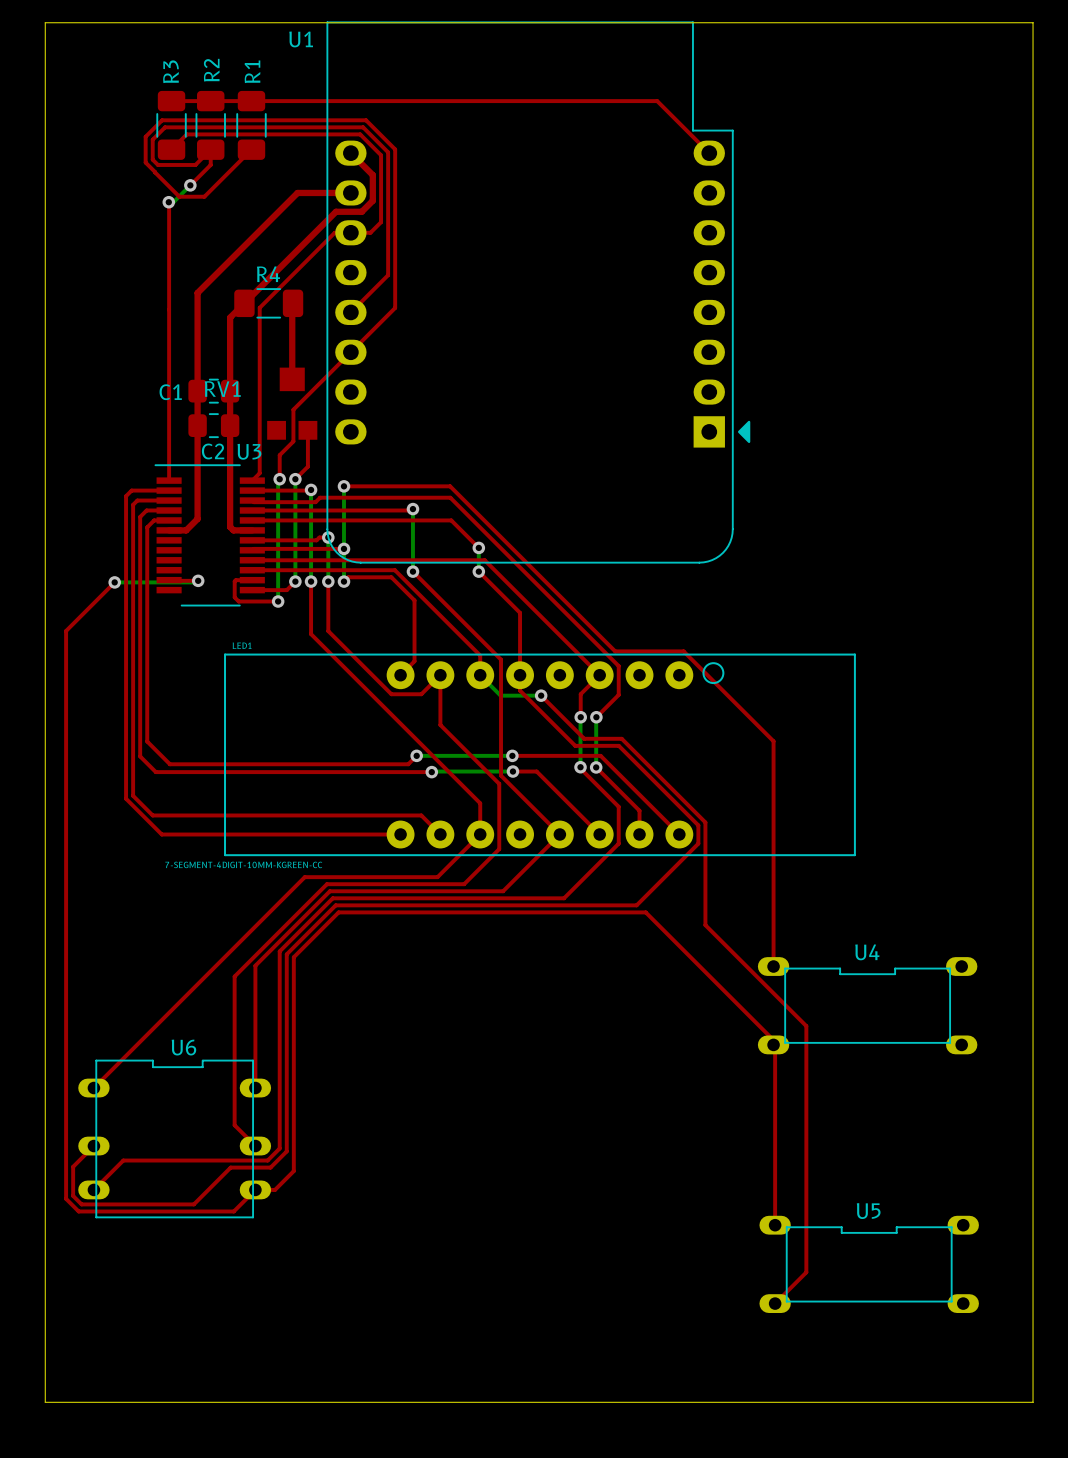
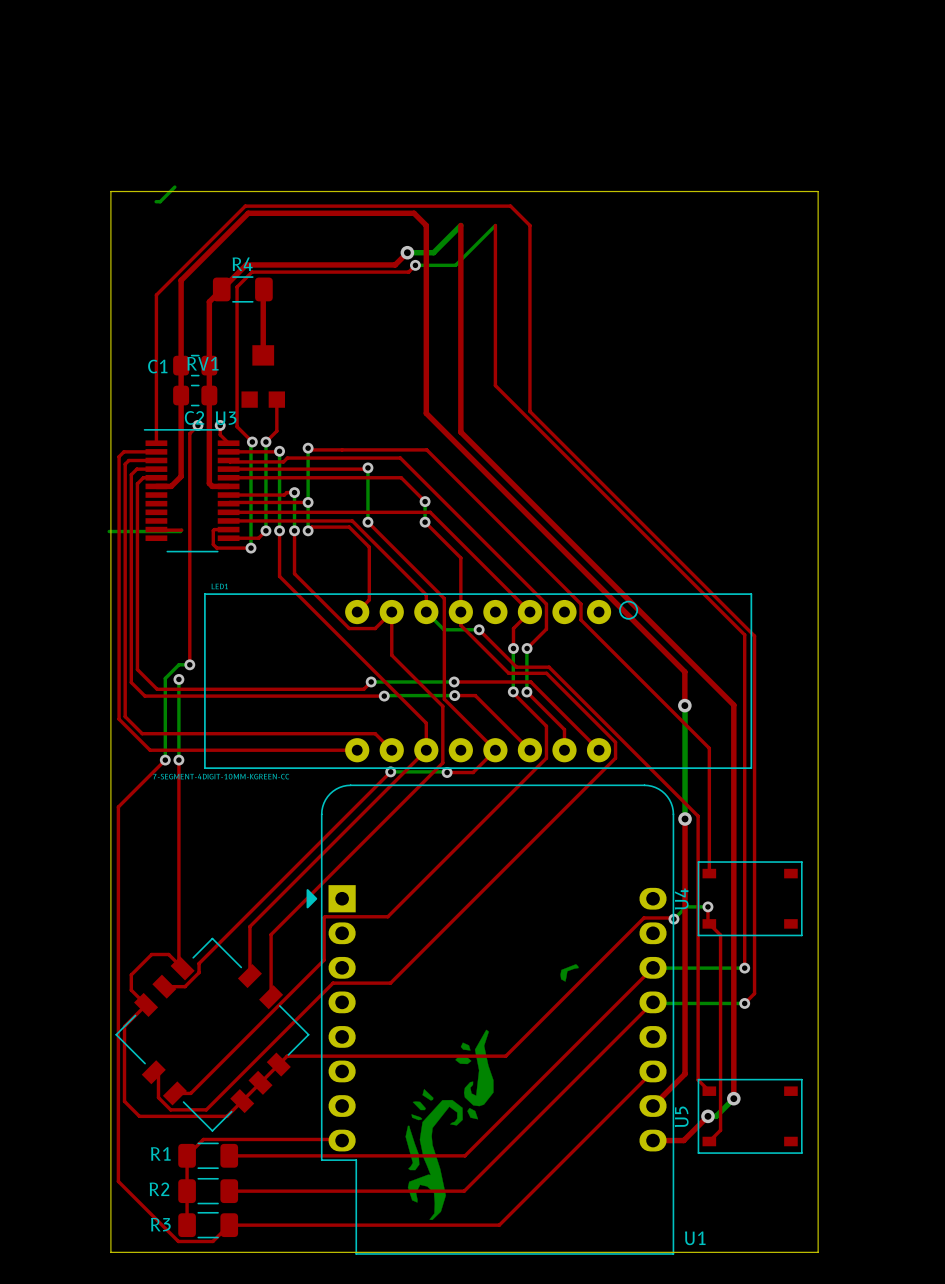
board edge: (45, 22) (1033, 22) (1033, 1402) (45, 1402) (45, 22) -> (110, 191) (110, 1252) (818, 1252) (818, 191) (110, 191)
R2 name position: R2 (211, 70) -> R2 (159, 1189)
R3 name position: R3 (170, 71) -> R3 (160, 1224)
R1 name position: R1 (252, 71) -> R1 (160, 1153)
top track: (171, 101) (657, 101) (709, 153) -> none
R3 rotation: 0° (171, 125) -> 90° clockwise (208, 1225)
R3 position: (171, 125) -> (208, 1225)
R2 rotation: 0° (210, 125) -> 90° clockwise (208, 1191)
R2 position: (210, 125) -> (208, 1191)
R1 rotation: 0° (251, 125) -> 90° clockwise (208, 1155)
R1 position: (251, 125) -> (208, 1155)
top track: (181, 149) (171, 149) (186, 134) (360, 134) (381, 155) (381, 222) (370, 232) (334, 232) (259, 307) (259, 473) (252, 480) -> (220, 425) (220, 434) (228, 443)
top track: (251, 149) (204, 196) (179, 196) (145, 162) (145, 136) (162, 120) (366, 120) (395, 149) (395, 307) (293, 409) (293, 441) (279, 455) (279, 479) -> (415, 265) (408, 272) (252, 272) (237, 287) (237, 426) (252, 442)
top track: (350, 153) (372, 175) (372, 200) (361, 211) (335, 211) (272, 275) -> (407, 252) (395, 264) (246, 264)
top track: (190, 185) (210, 164) (210, 149) (195, 164) (157, 164) (152, 159) (152, 139) (165, 127) (363, 127) (388, 152) (388, 275) (350, 312) -> none
via: (190, 185) -> none
top track: (350, 192) (297, 192) (275, 215) -> (684, 705) (684, 671) (426, 413) (426, 225) (414, 213) (248, 213)
top track: (168, 202) (169, 309) -> (744, 1003) (754, 993) (754, 636) (529, 411) (529, 225) (510, 206) (245, 206) (156, 295)
via: (168, 202) -> none
top track: none -> (460, 225) (460, 432) (733, 705) (733, 1098)
bottom track: none -> (460, 225) (433, 252) (407, 252)
top track: none -> (495, 225) (495, 385) (744, 634) (744, 968)
bottom track: none -> (495, 225) (455, 265) (415, 265)
via: none -> (407, 252)
via: none -> (415, 265)
U1 rotation: 0° (538, 292) -> 180° (490, 1019)
U1 position: (538, 292) -> (490, 1019)
top track: none -> (197, 425) (189, 433) (189, 664)
via: none -> (197, 425)
via: none -> (220, 425)
top track: (343, 486) (450, 486) (615, 651) (683, 651) (773, 741) (773, 966) -> (308, 448) (309, 449) (426, 449) (581, 604) (581, 619) (709, 748) (709, 873)
via: (198, 580) -> none
top track: (114, 582) (66, 631) (66, 1198) (78, 1211) (233, 1211) (255, 1189) (275, 1189) (293, 1171) (293, 957) (338, 912) (645, 912) (773, 1040) (775, 1046) -> none
via: (114, 582) -> none
bottom track: none -> (189, 664) (178, 664) (165, 678) (165, 760)
via: none -> (189, 664)
bottom track: none -> (178, 679) (178, 760)
via: none -> (178, 679)
bottom track: none -> (685, 705) (685, 819)
via: none -> (684, 705)
top track: (705, 822) (705, 925) (806, 1026) (806, 1272) (775, 1303) -> (621, 739) (698, 816) (698, 1079) (709, 1091)
top track: none -> (165, 760) (118, 807) (118, 1181) (178, 1241) (212, 1241) (229, 1225) (499, 1225) (653, 1071)
via: none -> (165, 760)
top track: none -> (178, 760) (178, 964)
via: none -> (178, 760)
top track: none -> (390, 771) (199, 963) (199, 972) (185, 986) (164, 986)
bottom track: none -> (390, 771) (447, 772)
via: none -> (390, 771)
via: none -> (447, 772)
top track: (534, 860) (503, 891) (329, 891) (255, 965) (255, 1088) -> (473, 772) (447, 772)
top track: (437, 877) (304, 877) (93, 1088) -> (389, 787) (249, 926) (249, 976)
top track: (464, 884) (326, 884) (234, 976) (234, 1125) (255, 1146) -> (412, 793) (271, 934) (271, 997)
top track: (564, 898) (332, 898) (279, 951) (279, 1148) (267, 1160) (123, 1160) (93, 1189) -> (499, 805) (387, 916) (324, 916) (324, 960) (190, 1093) (174, 1093)
top track: (636, 905) (335, 905) (286, 954) (286, 1151) (270, 1167) (230, 1167) (193, 1204) (81, 1204) (73, 1195) (73, 1166) (93, 1146) -> (561, 811) (390, 983) (333, 983) (206, 1109) (170, 1109) (158, 1097) (158, 1067) (153, 1072)
top track: none -> (685, 819) (685, 1074) (653, 1106)
via: none -> (685, 819)
U4 name position: U4 (867, 952) -> U4 (681, 898)
U4 footprint: [757, 957, 978, 1055] -> [697, 861, 803, 937]
top track: none -> (707, 906) (707, 922) (720, 935) (720, 1130) (709, 1141)
bottom track: none -> (707, 906) (686, 906) (673, 919)
via: none -> (707, 906)
top track: none -> (673, 919) (643, 917) (505, 1056) (287, 1056) (227, 1116) (139, 1116) (124, 1101) (124, 1026) (146, 1004) (131, 990) (131, 974) (151, 954) (168, 954) (182, 968)
via: none -> (673, 919)
top track: (775, 1041) (775, 1225) -> none
drawing: none -> [405, 964, 579, 1221]
top track: none -> (653, 967) (465, 1155) (229, 1155)
bottom track: none -> (653, 967) (744, 968)
via: none -> (744, 968)
top track: none -> (653, 1002) (464, 1191) (229, 1191)
bottom track: none -> (653, 1002) (744, 1003)
via: none -> (744, 1003)
U6: (174, 1138) -> none
part: none -> (212, 1034)
U5 name position: U5 (868, 1211) -> U5 (681, 1116)
U5 footprint: [759, 1215, 979, 1314] -> [697, 1078, 803, 1154]
bottom track: none -> (733, 1098) (716, 1116) (707, 1116)
via: none -> (733, 1098)
top track: none -> (707, 1116) (683, 1140) (653, 1140)
via: none -> (707, 1116)
top track: none -> (342, 1140) (203, 1139) (187, 1155) (187, 1225)

